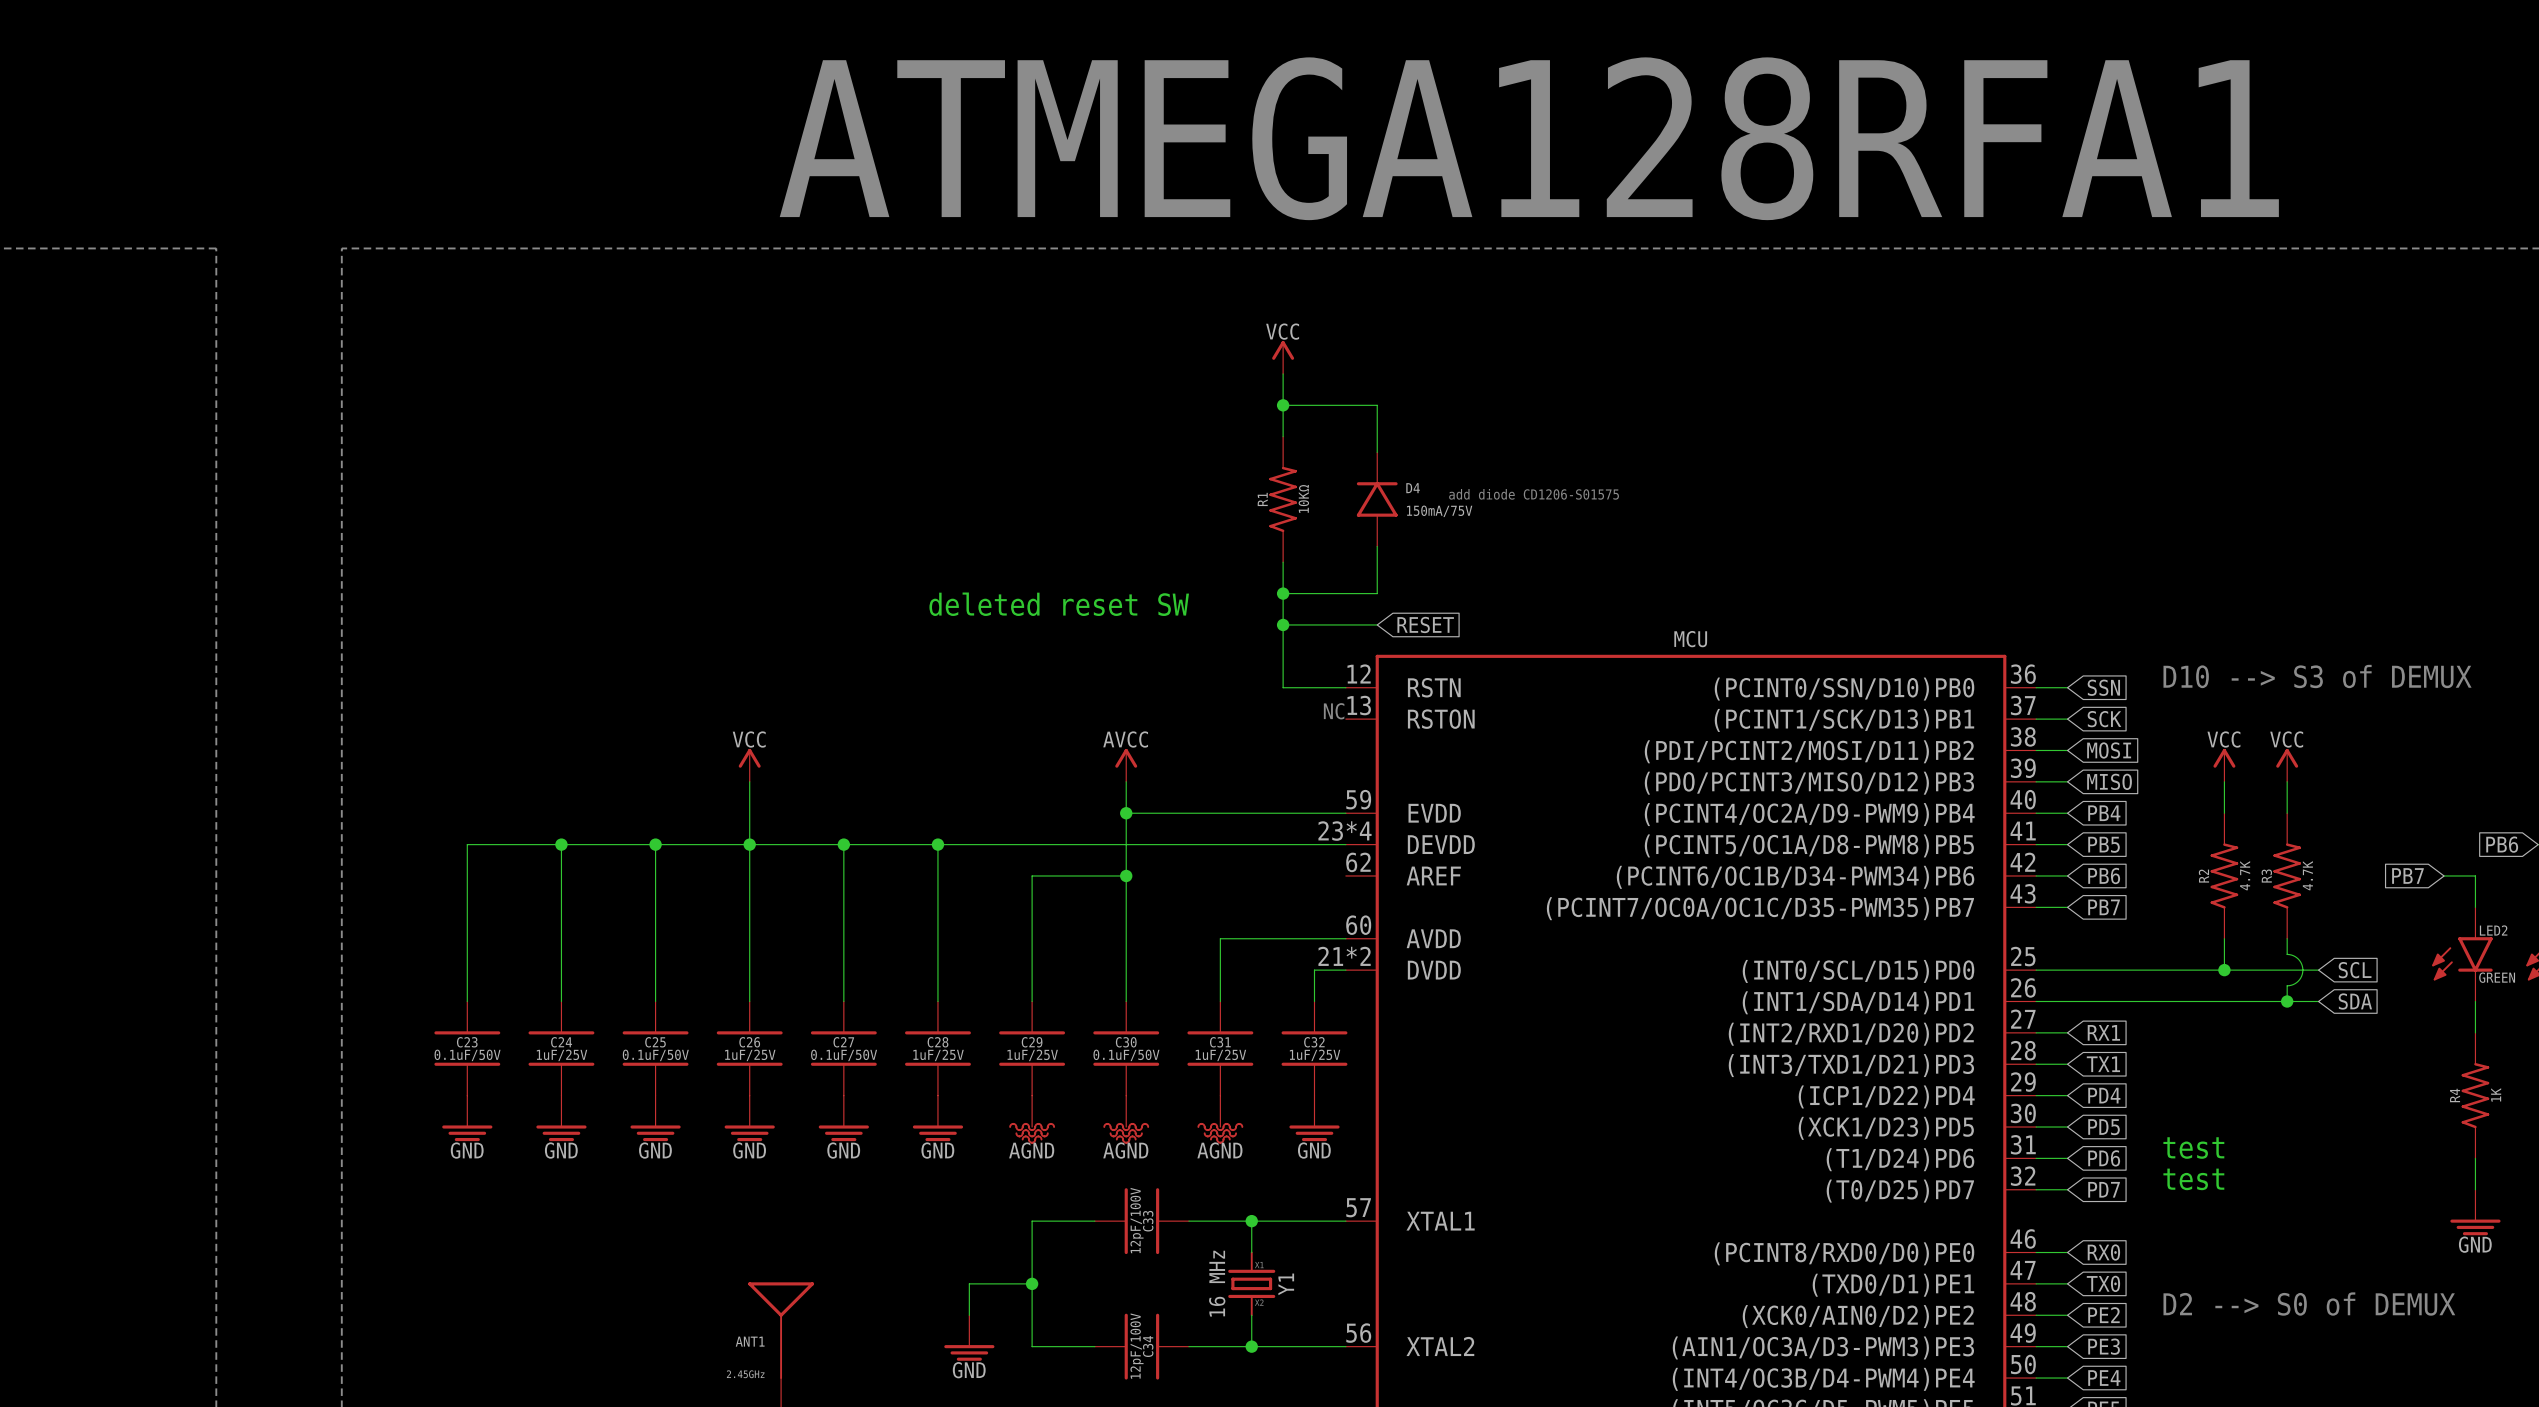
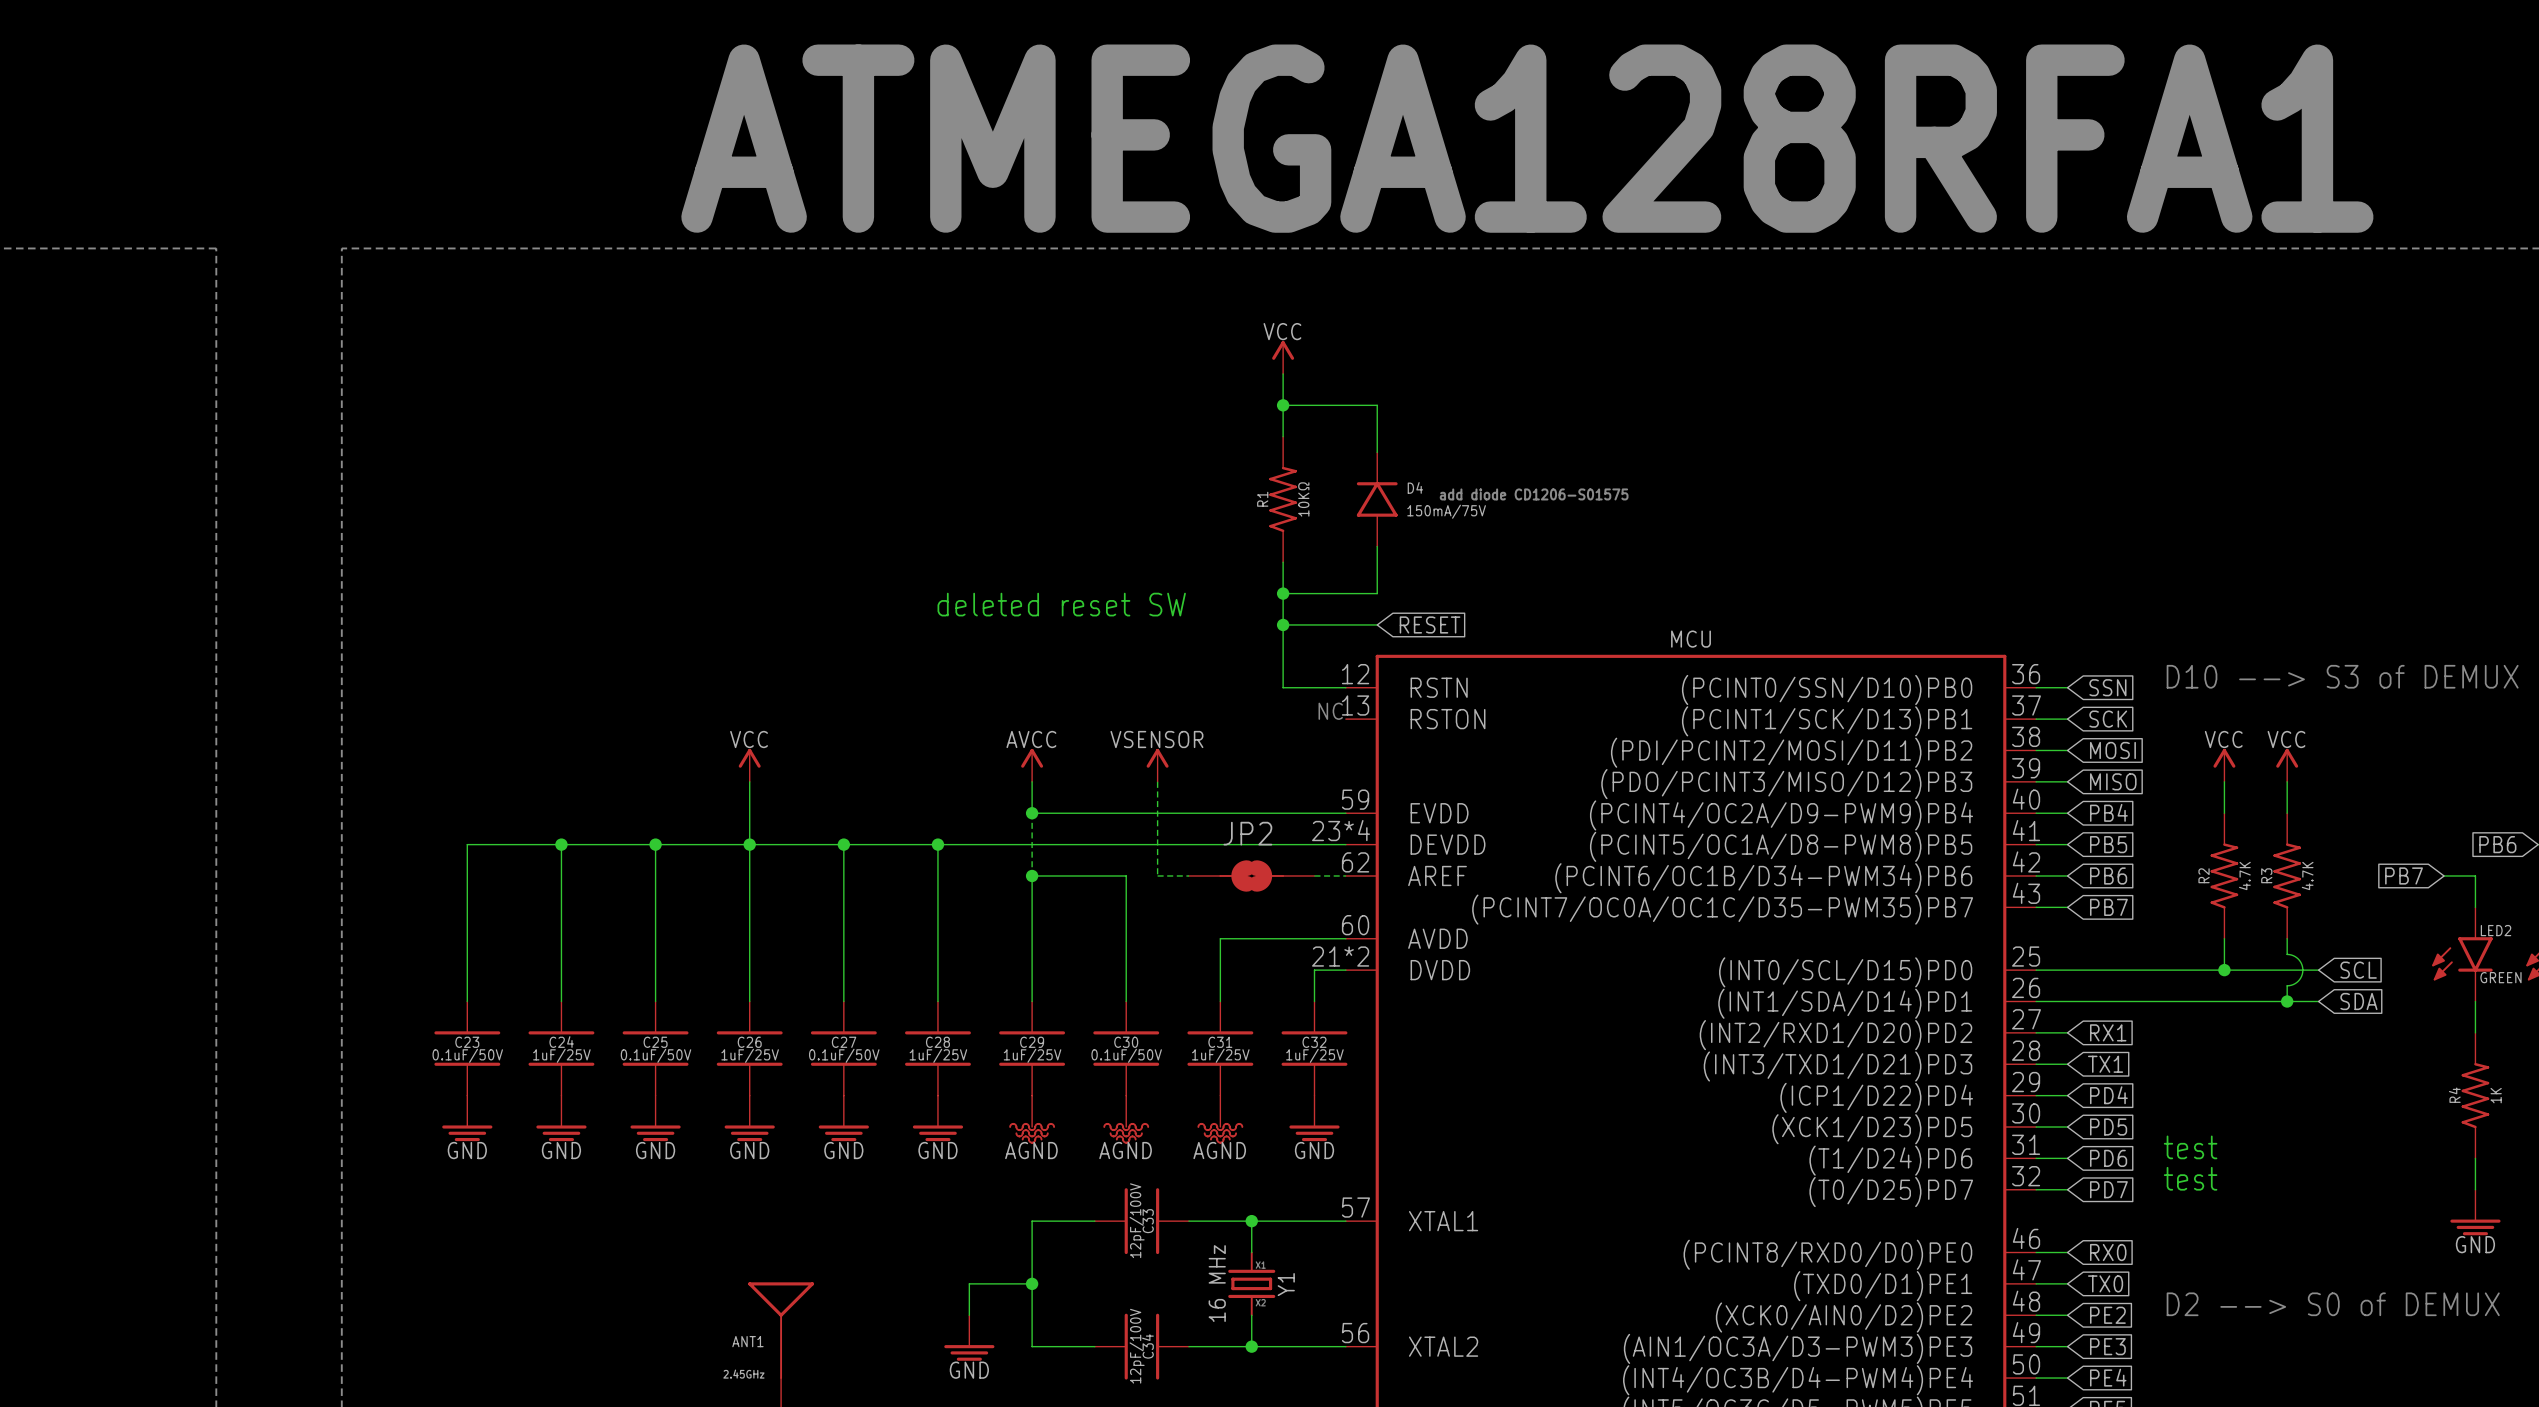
power symbol position: (1126, 765) -> (1032, 765)
power symbol: none -> (1157, 765)
wire: none -> (1032, 781) (1032, 813)
wire: (1126, 781) (1126, 875) -> none
wire: none -> (1157, 781) (1157, 875) (1188, 875)
wire: none -> (1032, 813) (1126, 813)
wire: none -> (1032, 813) (1032, 875)
junction: none -> (1032, 813)
junction: (1126, 813) -> none
junction: none -> (1032, 875)
junction: (1126, 875) -> none
JP2: none -> (1251, 875)
wire: none -> (1314, 875) (1345, 875)

